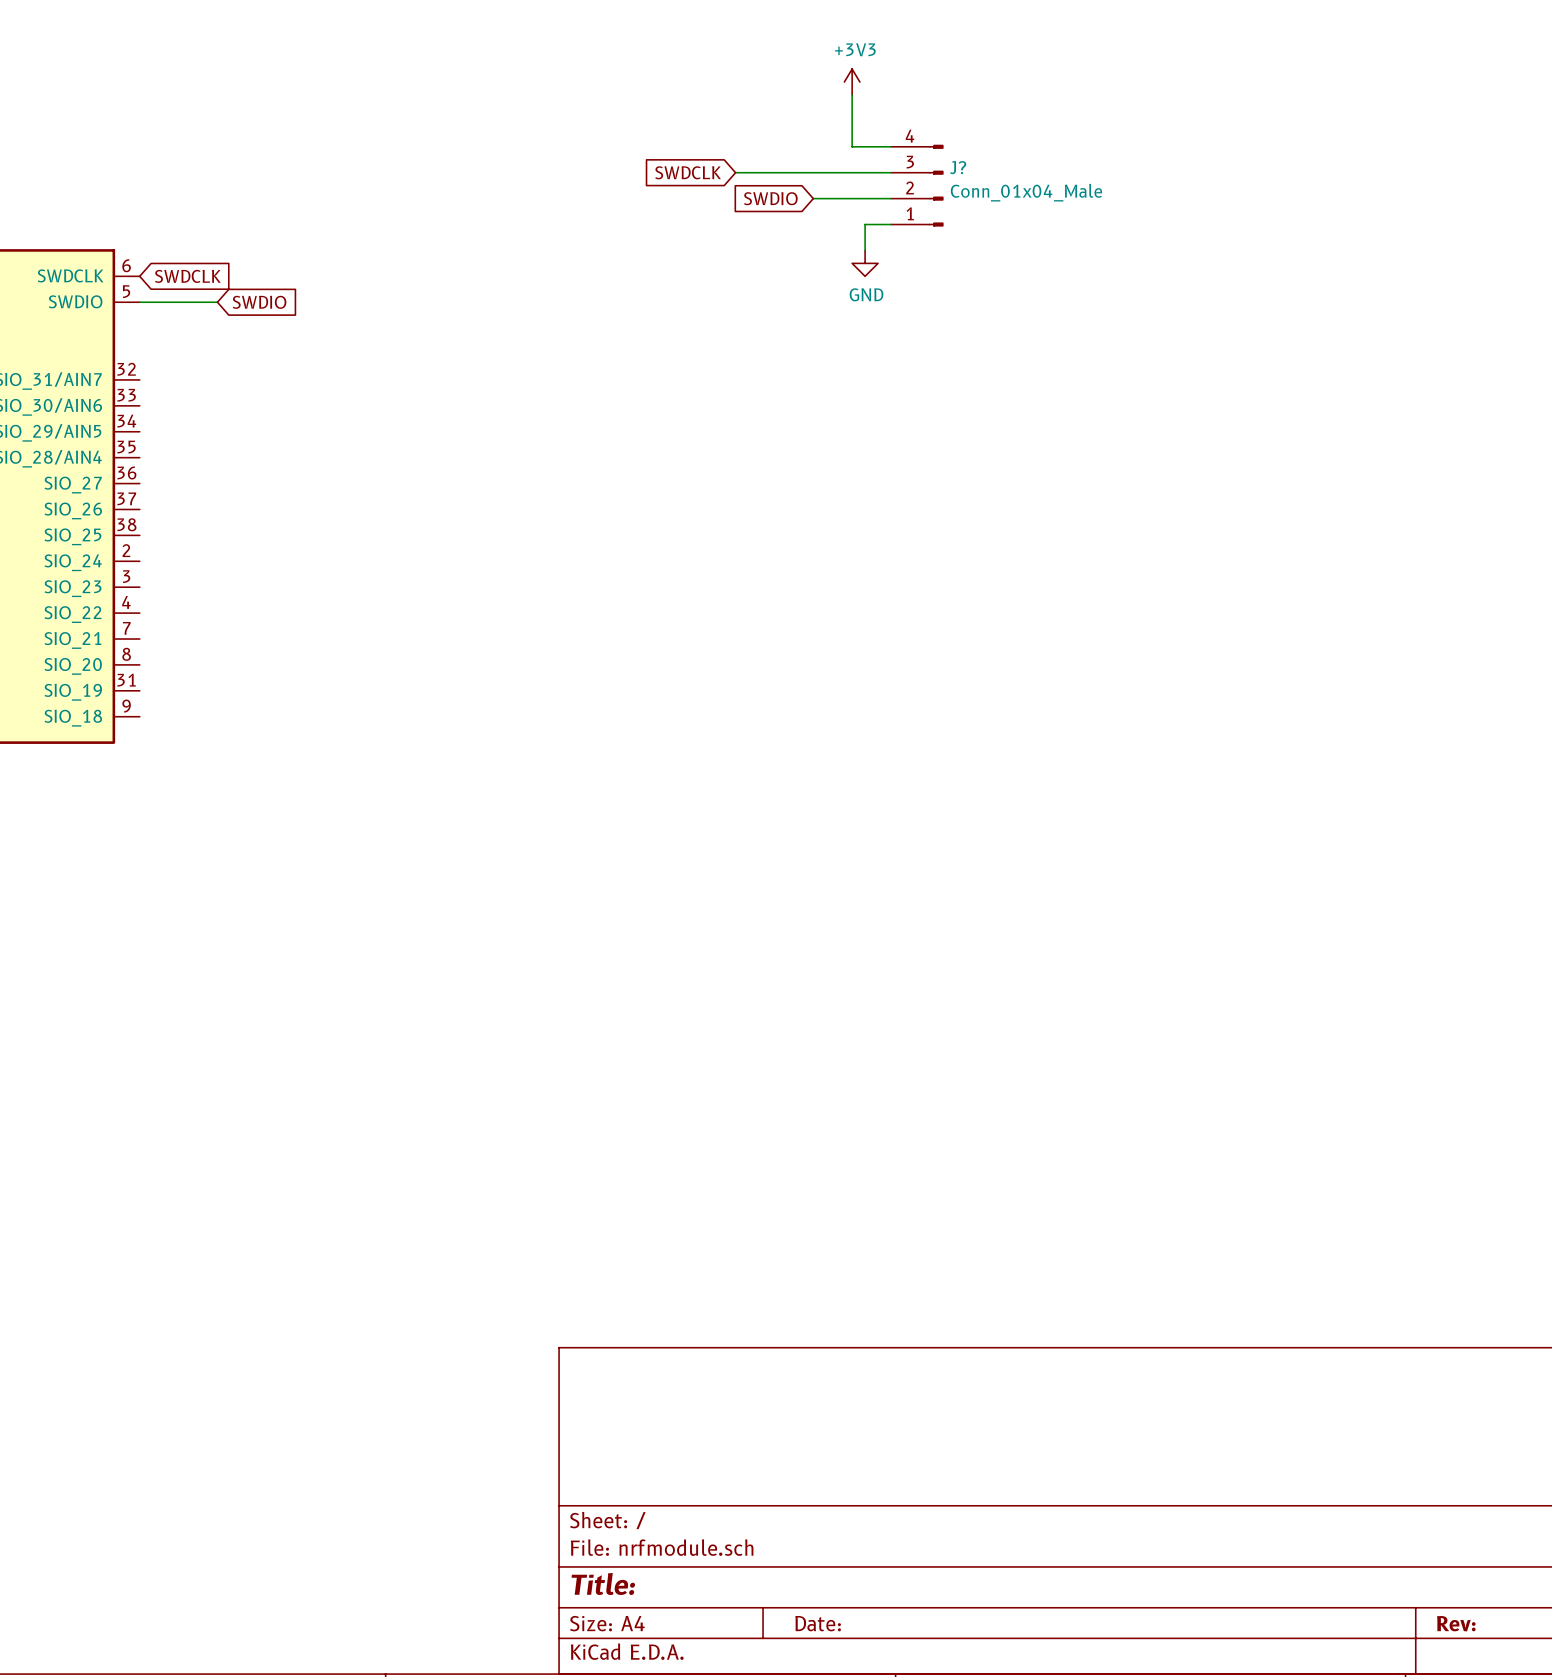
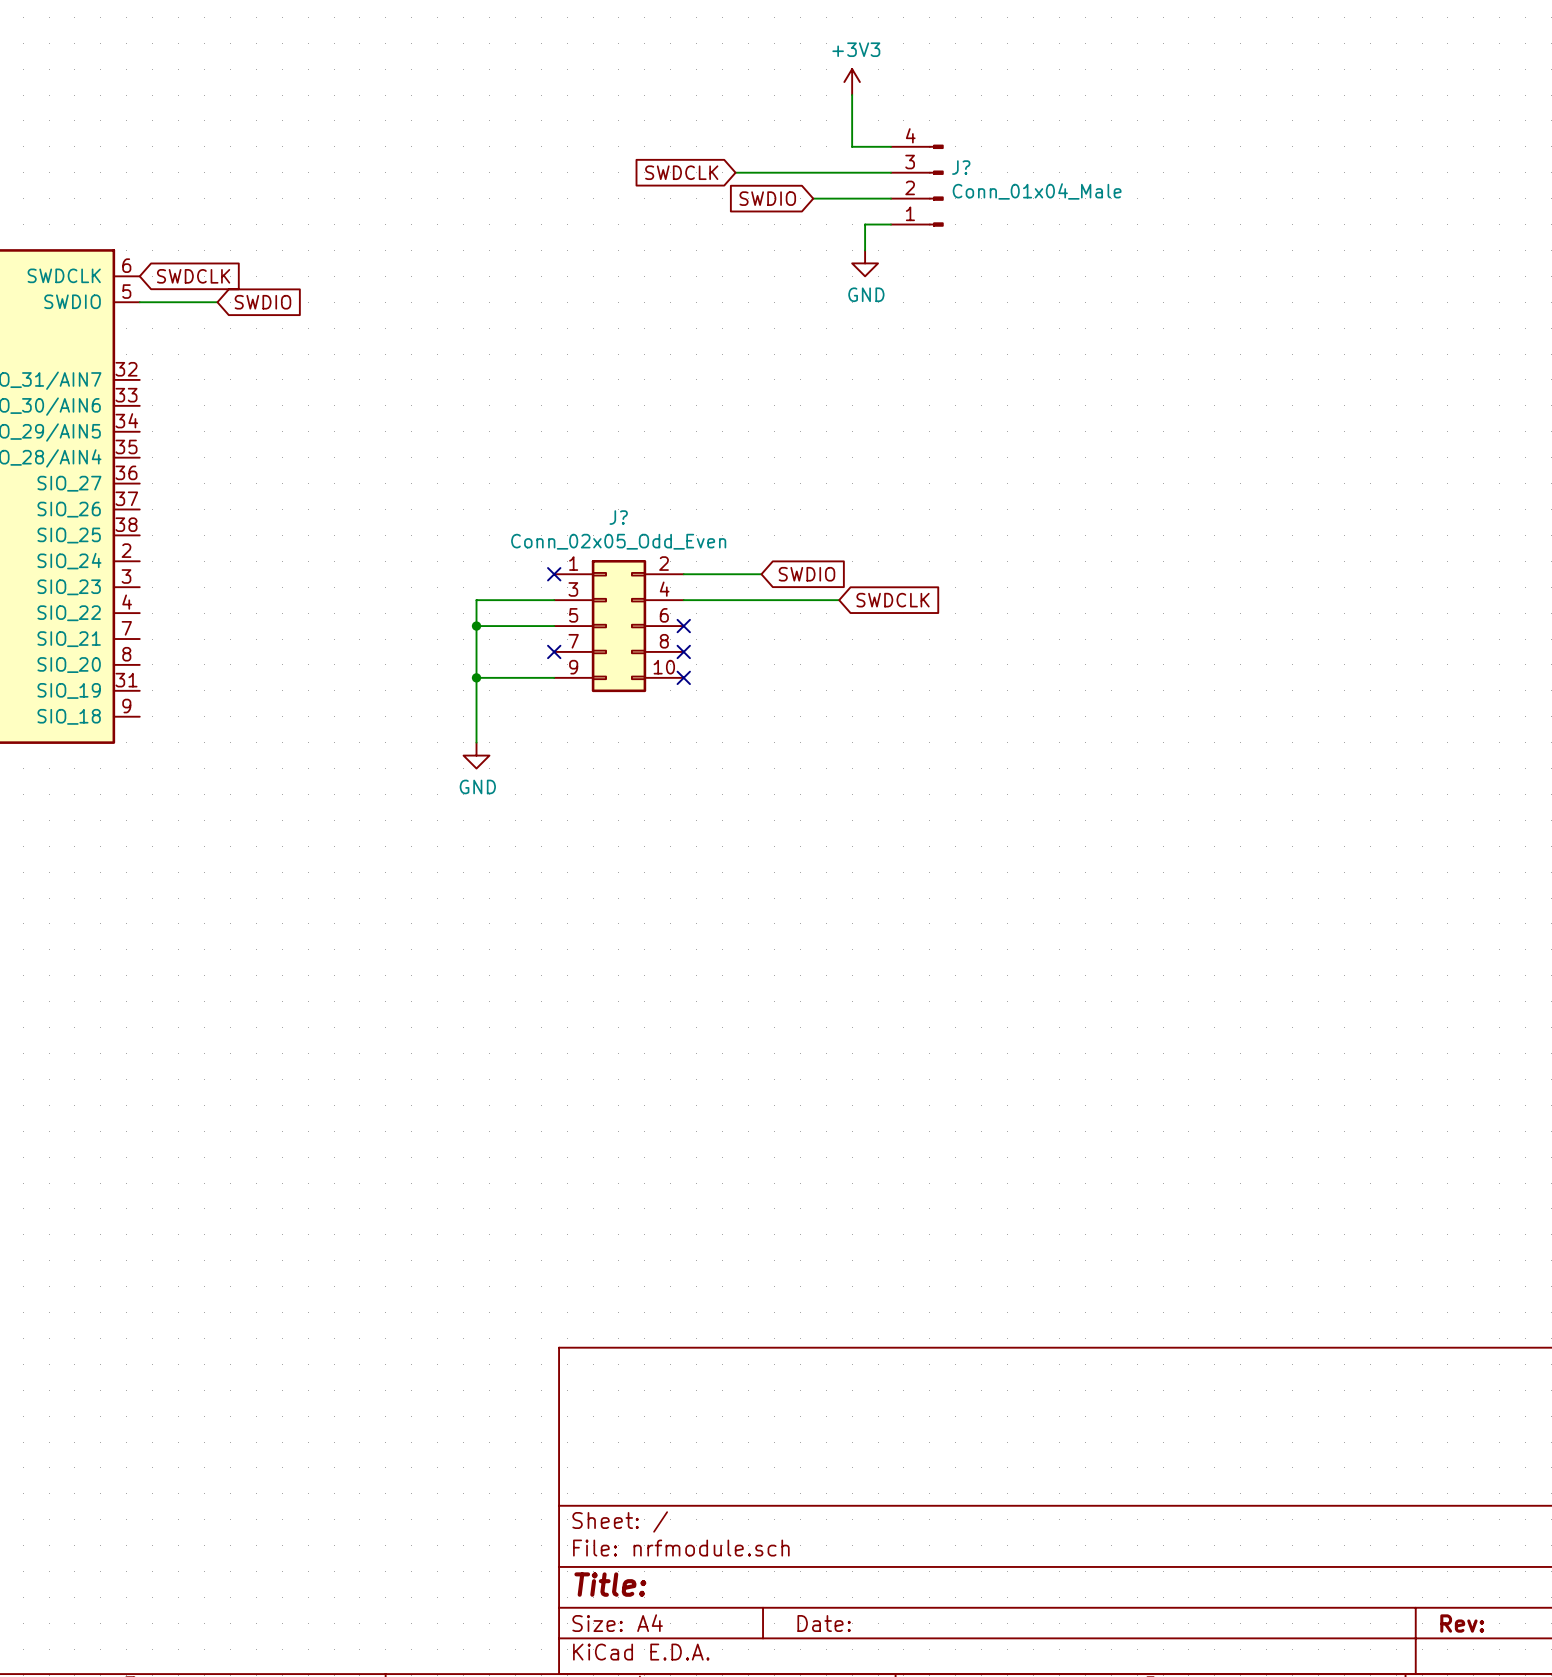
no-connect mark: none -> (554, 574)
wire: none -> (683, 574) (761, 574)
global label: none -> SWDIO (806, 574)
wire: none -> (554, 600) (476, 600) (476, 742)
wire: none -> (683, 600) (839, 600)
global label: none -> SWDCLK (893, 600)
wire: none -> (476, 626) (554, 626)
junction: none -> (476, 626)
J?: none -> Conn_02x05_Odd_Even (618, 626)
no-connect mark: none -> (683, 626)
no-connect mark: none -> (554, 651)
no-connect mark: none -> (683, 651)
wire: none -> (476, 677) (554, 677)
junction: none -> (476, 677)
no-connect mark: none -> (683, 677)
power symbol: none -> GND (476, 755)

